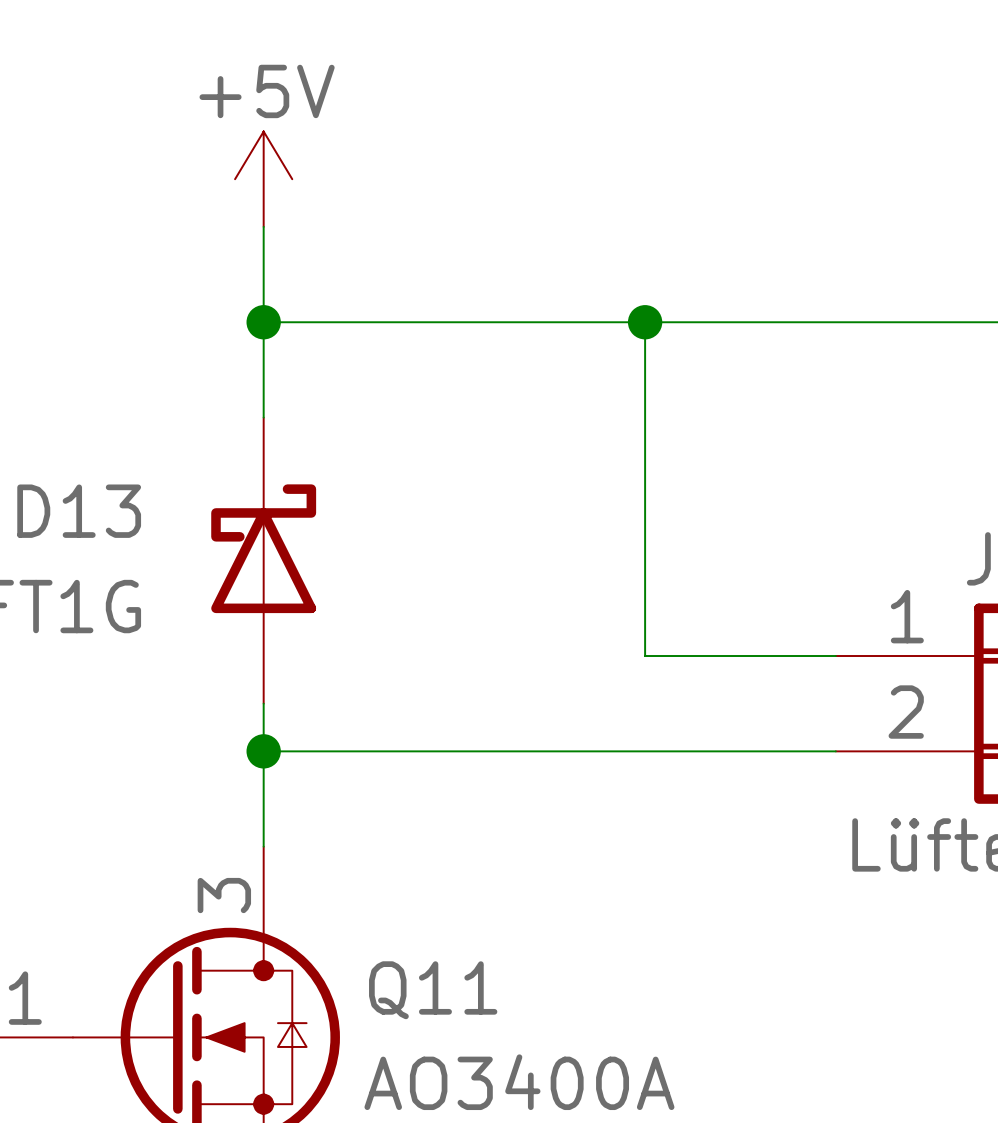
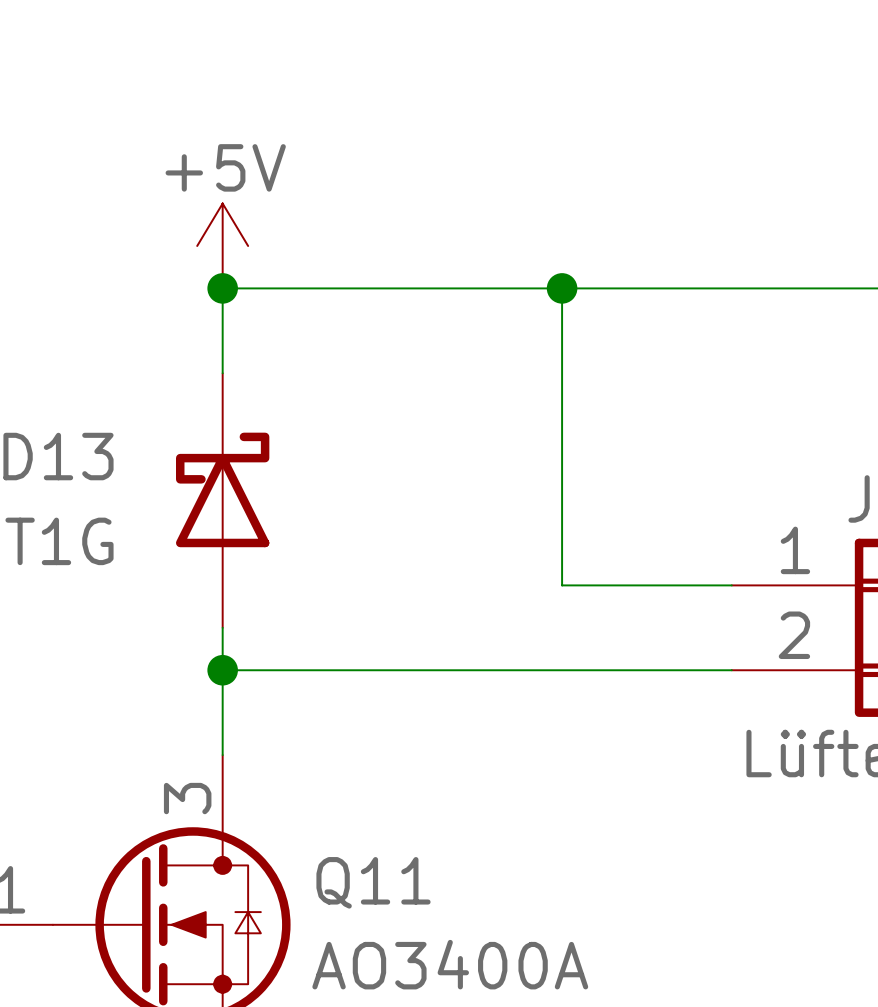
power symbol position: +5V (263, 179) -> +5V (222, 245)

